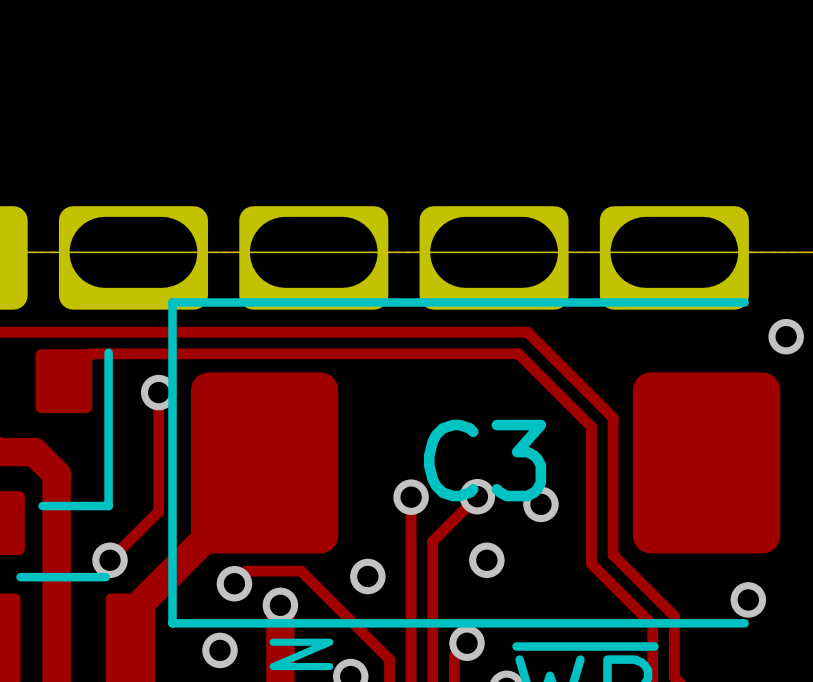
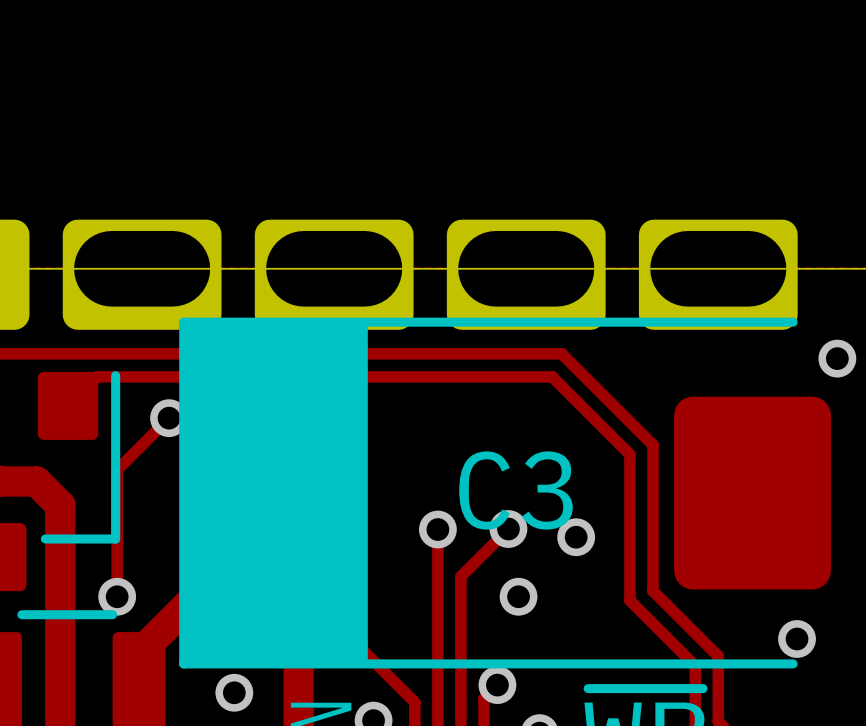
C3 footprint: [168, 298, 781, 628] -> [179, 317, 831, 669]
track: (158, 392) (158, 511) (110, 560) -> (169, 418) (117, 470) (117, 596)
via: (367, 576) -> none

